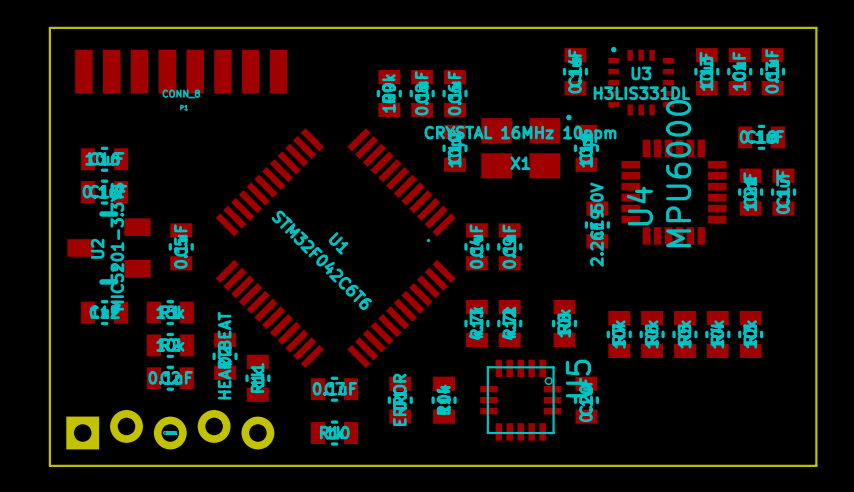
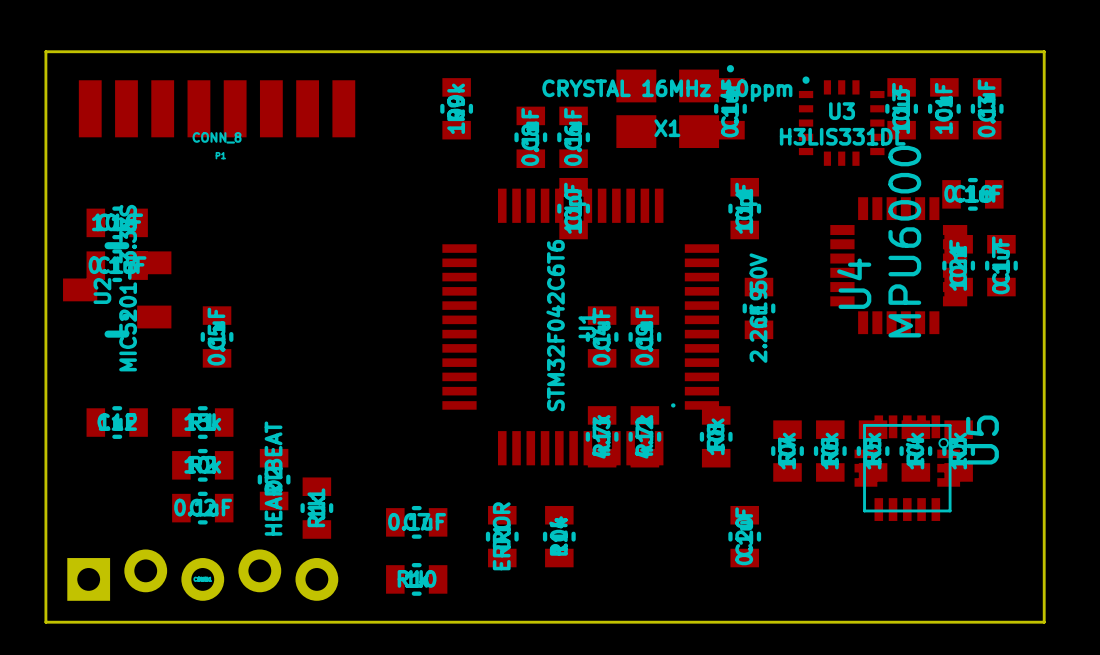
U3 position: (641, 81) -> (841, 121)
part position: (389, 93) -> (456, 108)
X1 position: (526, 146) -> (675, 106)
U4 position: (674, 192) -> (898, 265)
U2 position: (108, 247) -> (117, 289)
U1 rotation: 0° (335, 248) -> 45° clockwise (580, 326)
U5 position: (520, 400) -> (907, 468)

